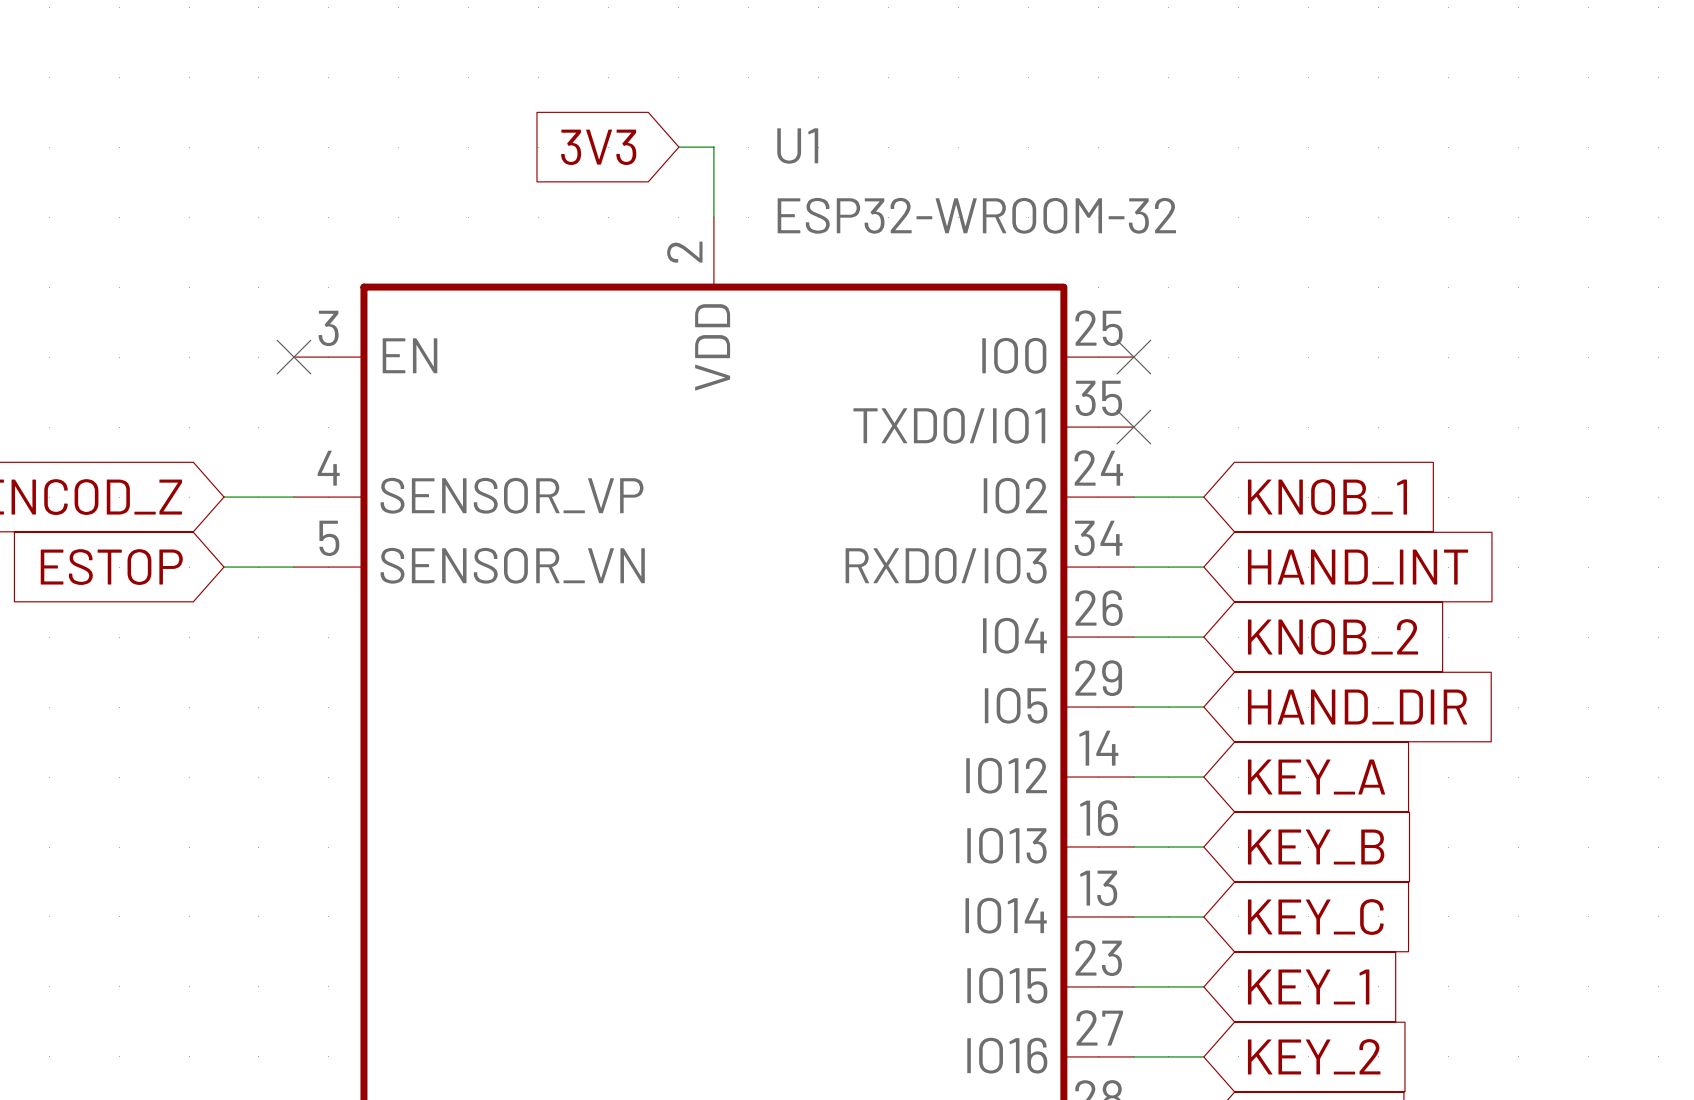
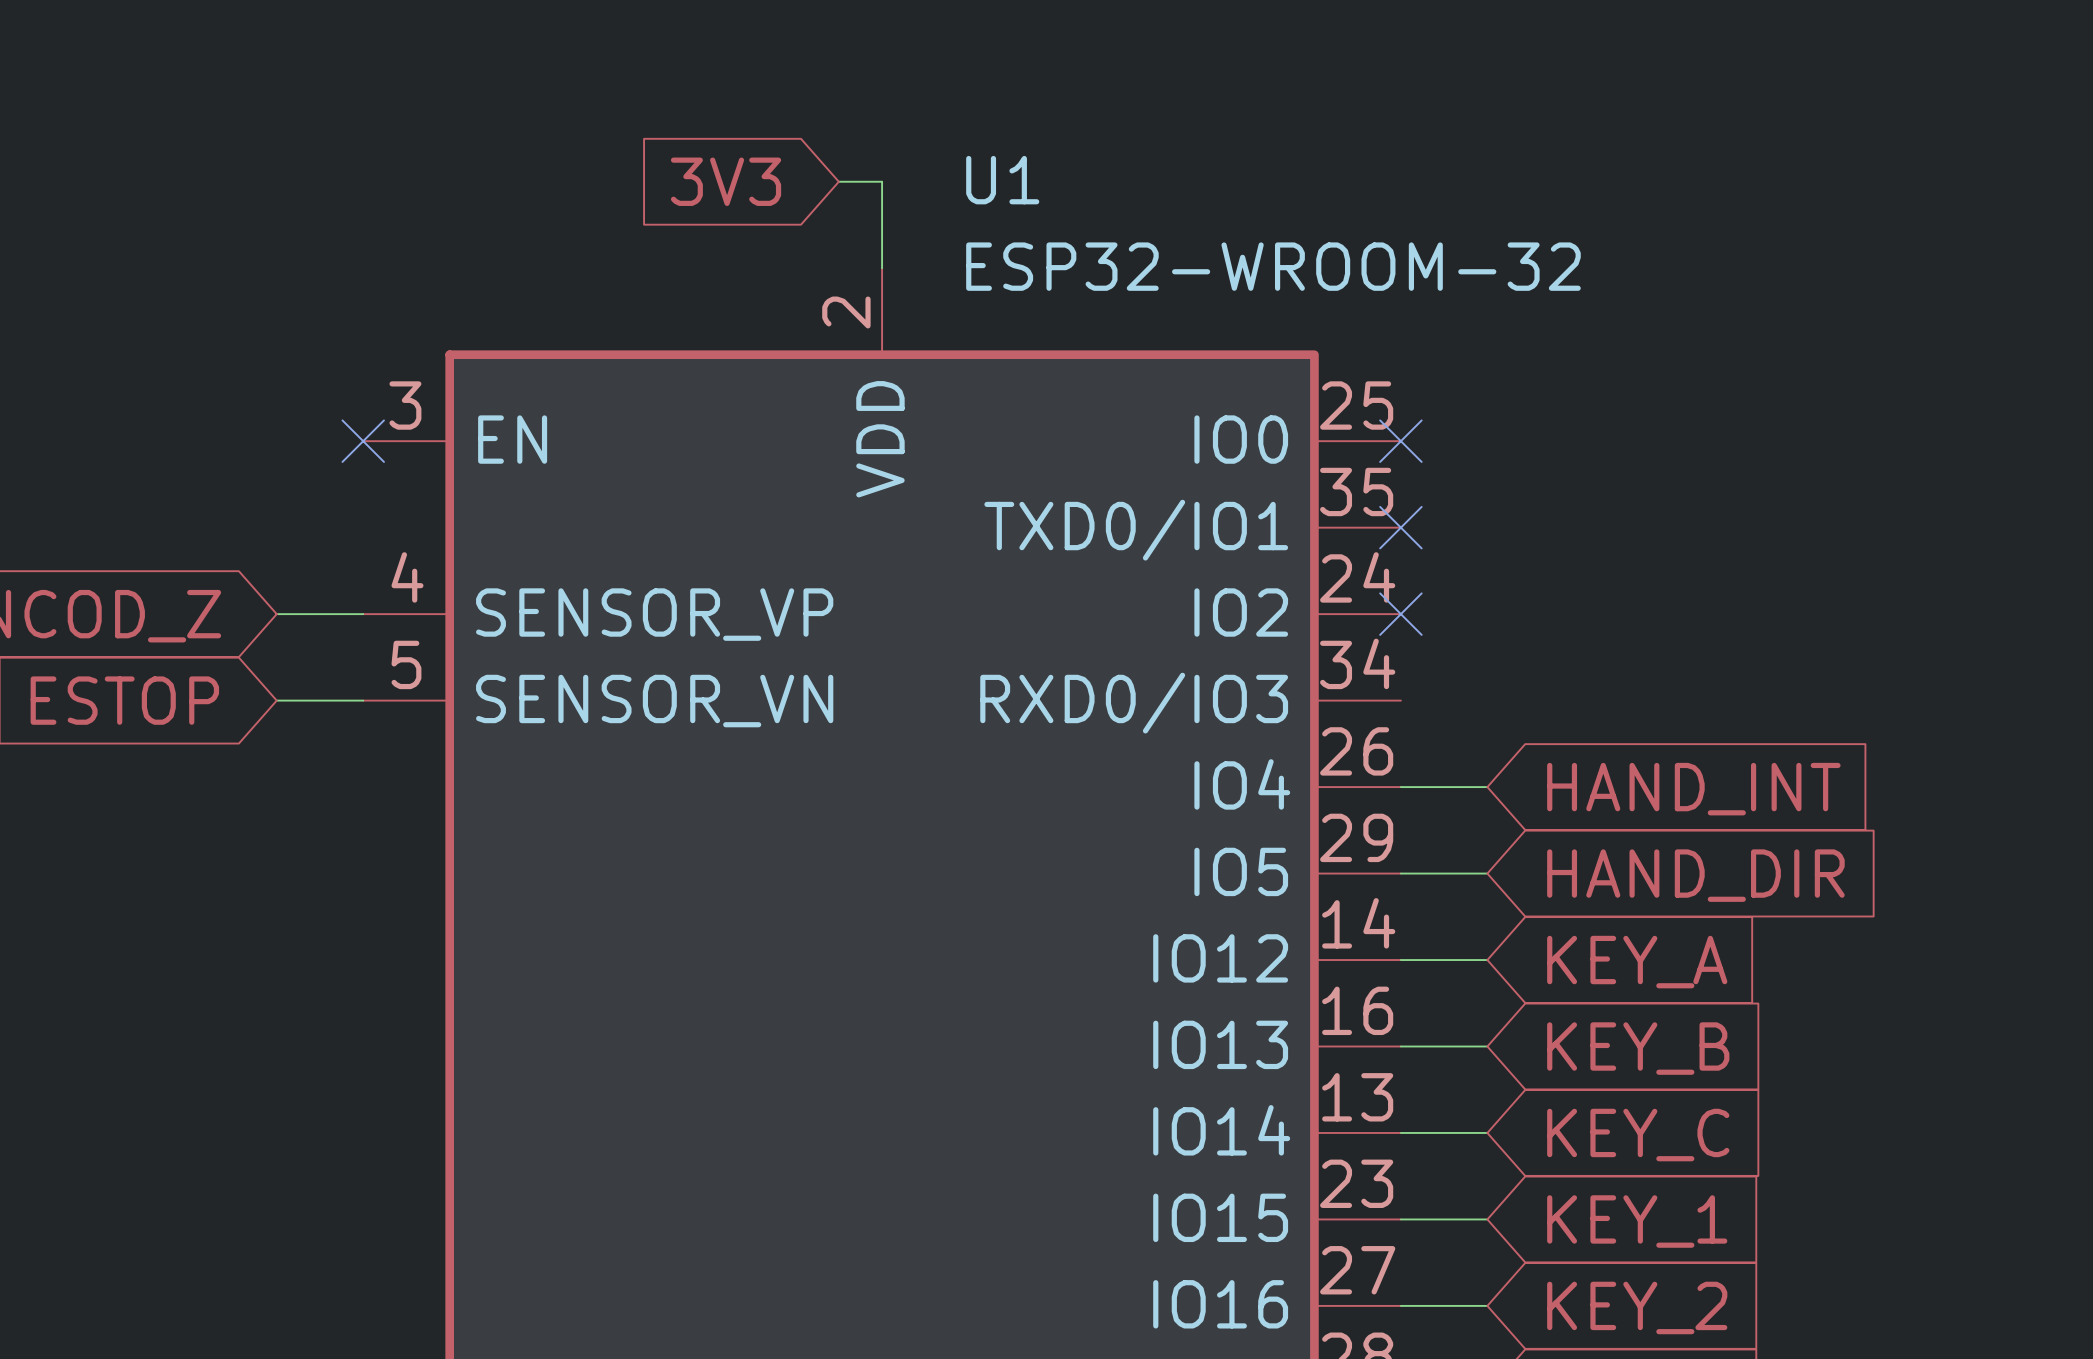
wire: (1133, 497) (1203, 497) -> none
no-connect mark: none -> (1400, 614)
global label: KNOB_1 (1327, 497) -> none
wire: (1133, 567) (1203, 567) -> none
global label: HAND_INT (1358, 567) -> none
global label: KNOB_2 (1333, 637) -> HAND_INT (1693, 789)

